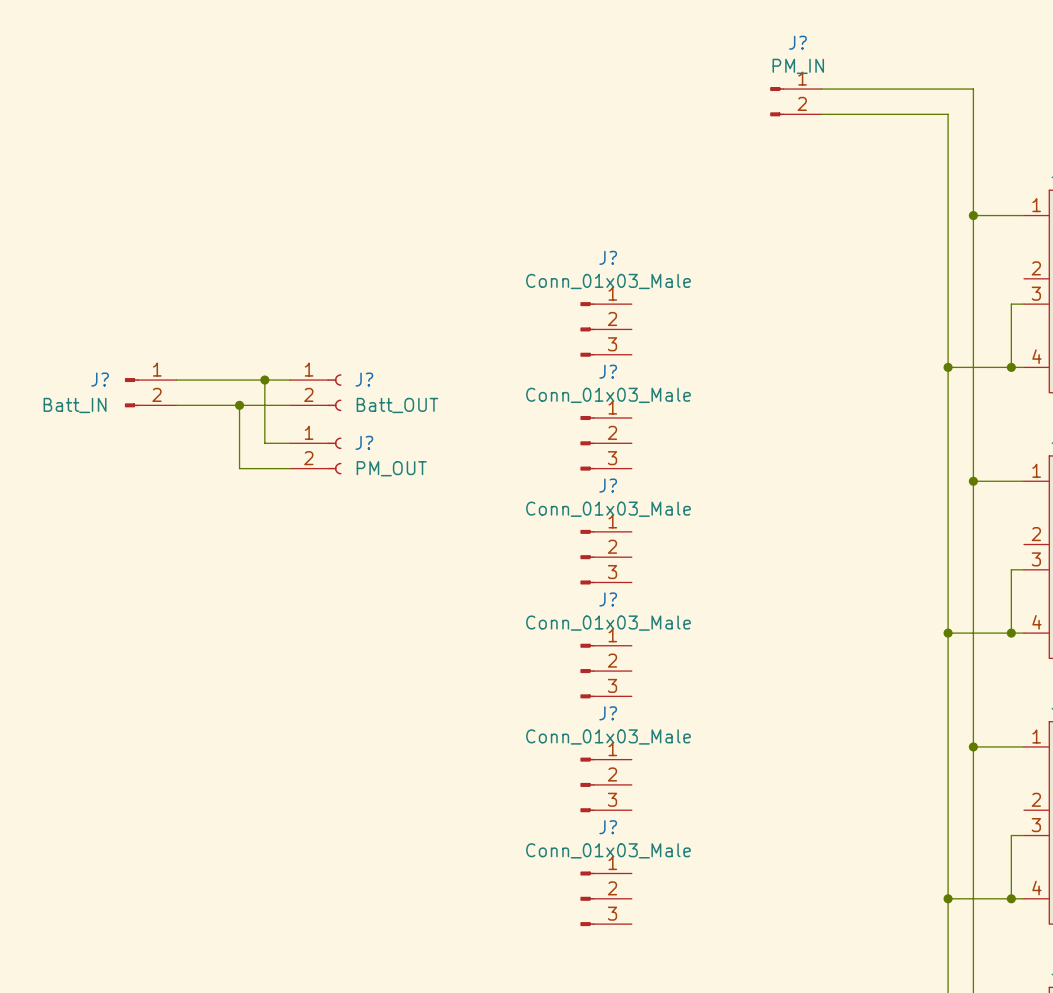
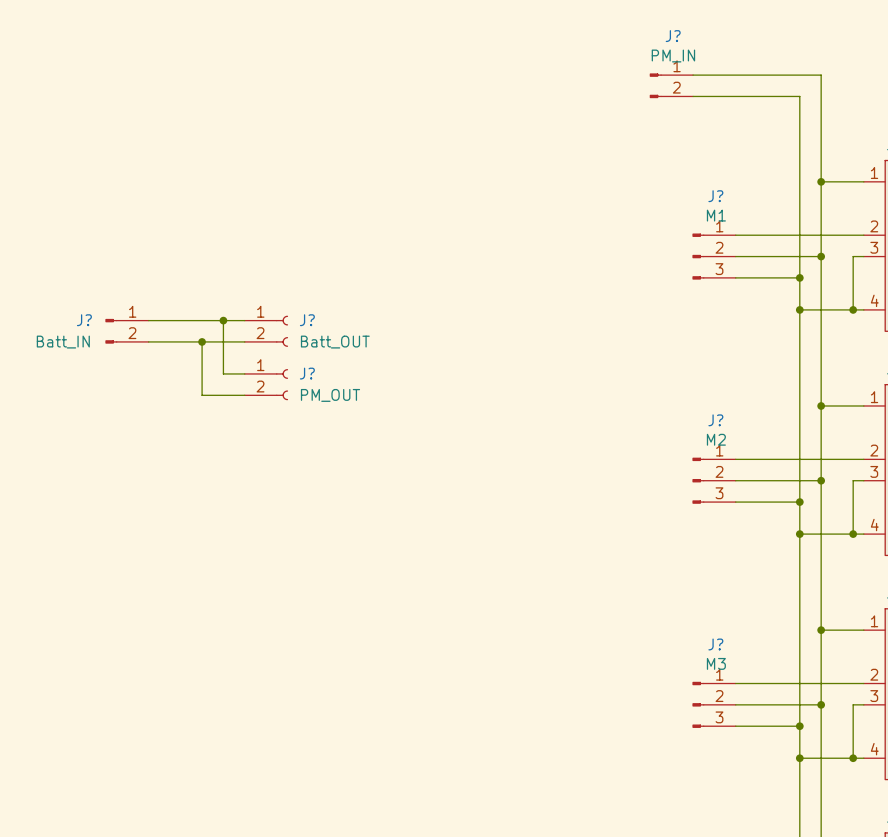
wire: none -> (735, 235) (863, 235)
J?: none -> M1 (714, 256)
wire: none -> (735, 256) (821, 256)
junction: none -> (821, 256)
J?: Conn_01x03_Male (606, 329) -> none
wire: none -> (735, 277) (799, 277)
junction: none -> (799, 277)
J?: Conn_01x03_Male (606, 443) -> none
wire: none -> (735, 459) (863, 459)
J?: Conn_01x03_Male (606, 557) -> none
J?: none -> M2 (714, 480)
wire: none -> (735, 480) (821, 480)
junction: none -> (821, 480)
wire: none -> (735, 502) (799, 502)
junction: none -> (799, 502)
J?: Conn_01x03_Male (606, 671) -> none
J?: Conn_01x03_Male (606, 784) -> none
wire: none -> (735, 683) (863, 683)
J?: none -> M3 (714, 704)
wire: none -> (735, 704) (821, 704)
junction: none -> (821, 704)
wire: none -> (735, 726) (799, 726)
junction: none -> (799, 726)
J?: Conn_01x03_Male (606, 898) -> none

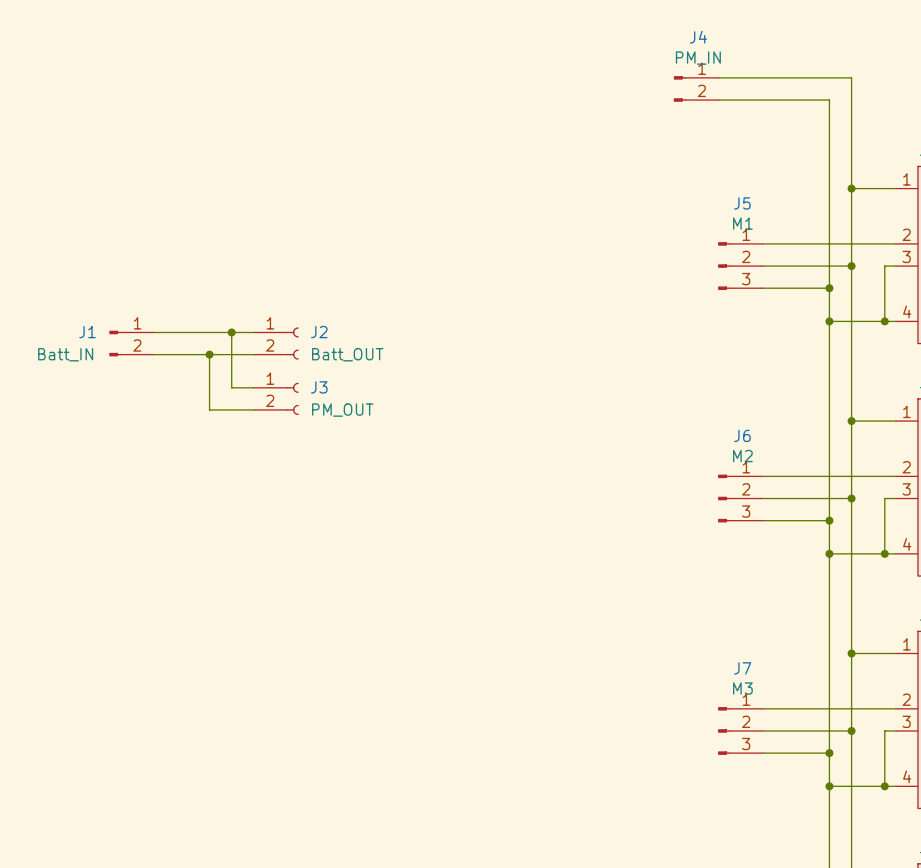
J? name: J? (673, 36) -> J4 (698, 37)
J? name: J? (715, 196) -> J5 (742, 203)
J? name: J? (84, 320) -> J1 (87, 332)
J? name: J? (307, 320) -> J2 (319, 332)
J? name: J? (307, 373) -> J3 (319, 387)
J? name: J? (715, 420) -> J6 (742, 435)
J? name: J? (715, 644) -> J7 (742, 668)

